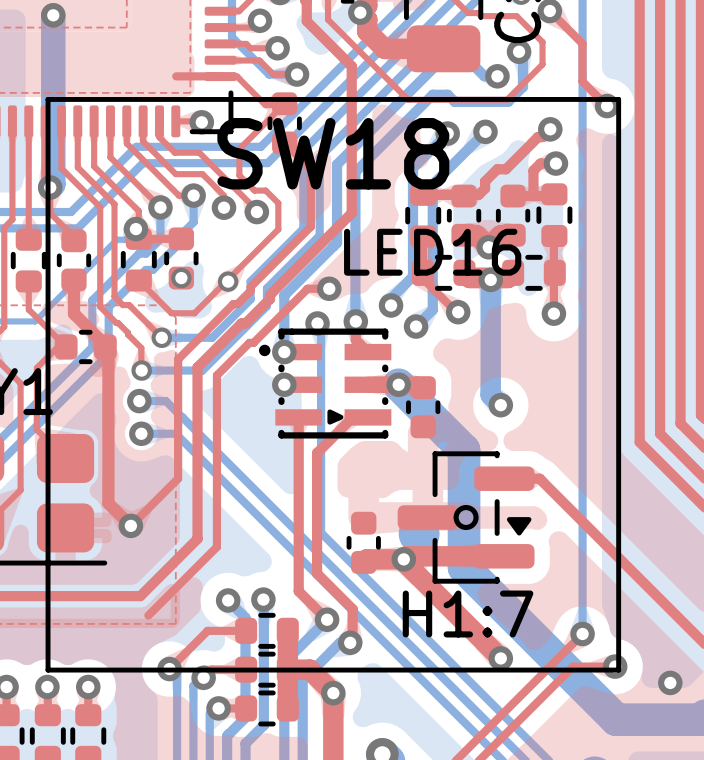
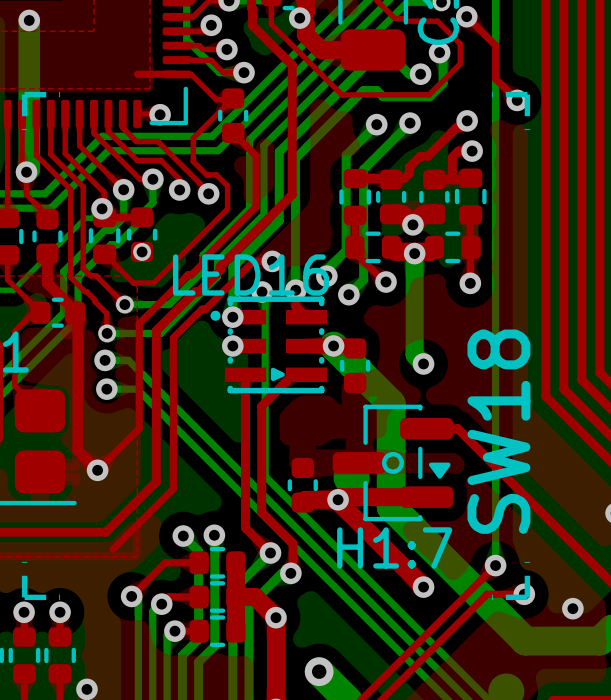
drawing shape: [45, 97, 622, 673] -> [21, 91, 531, 601]
LED16 name position: LED16 (432, 252) -> LED16 (251, 275)
via: (228, 281) -> none

